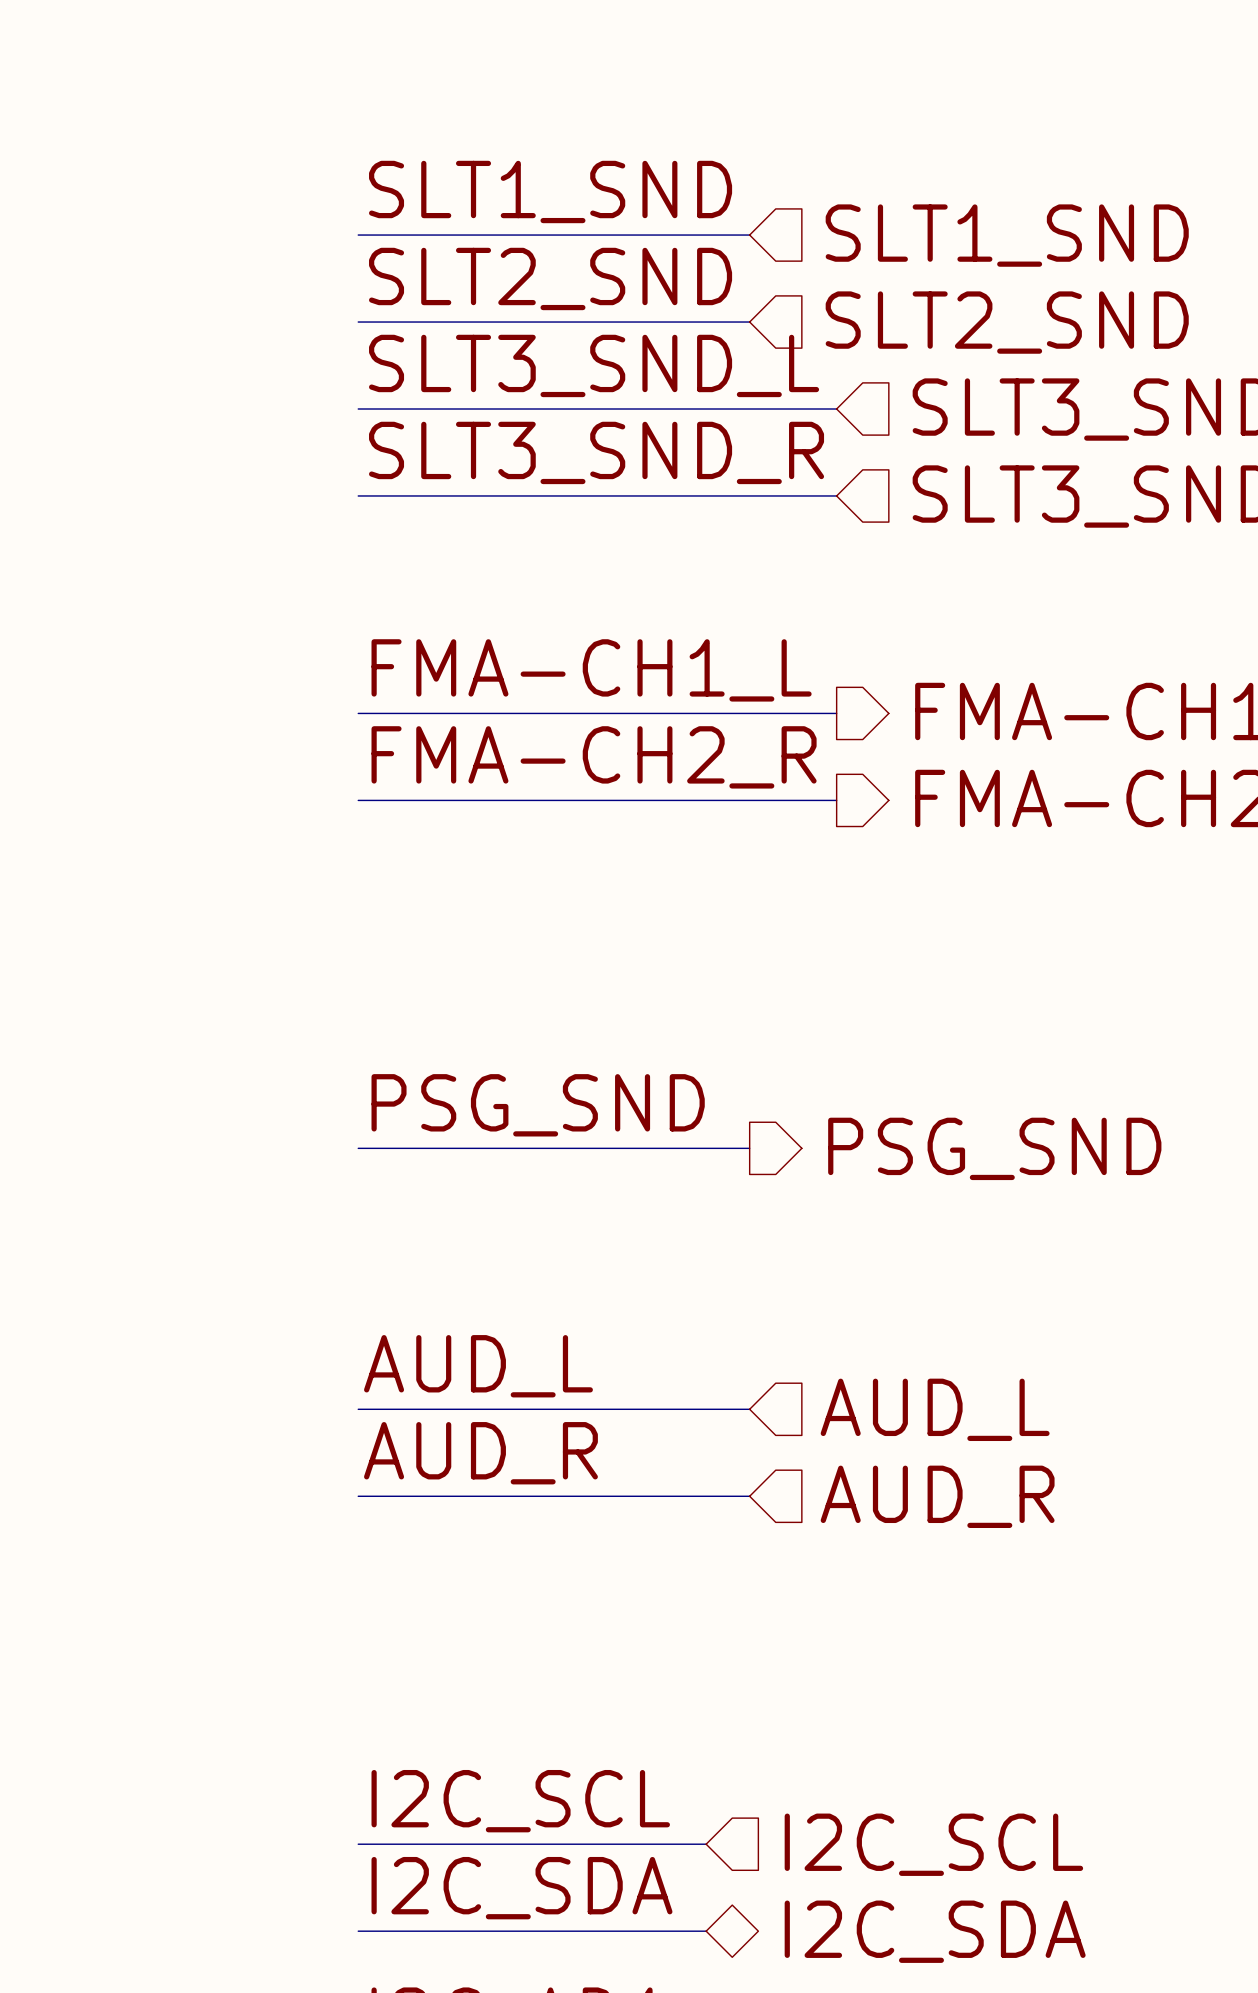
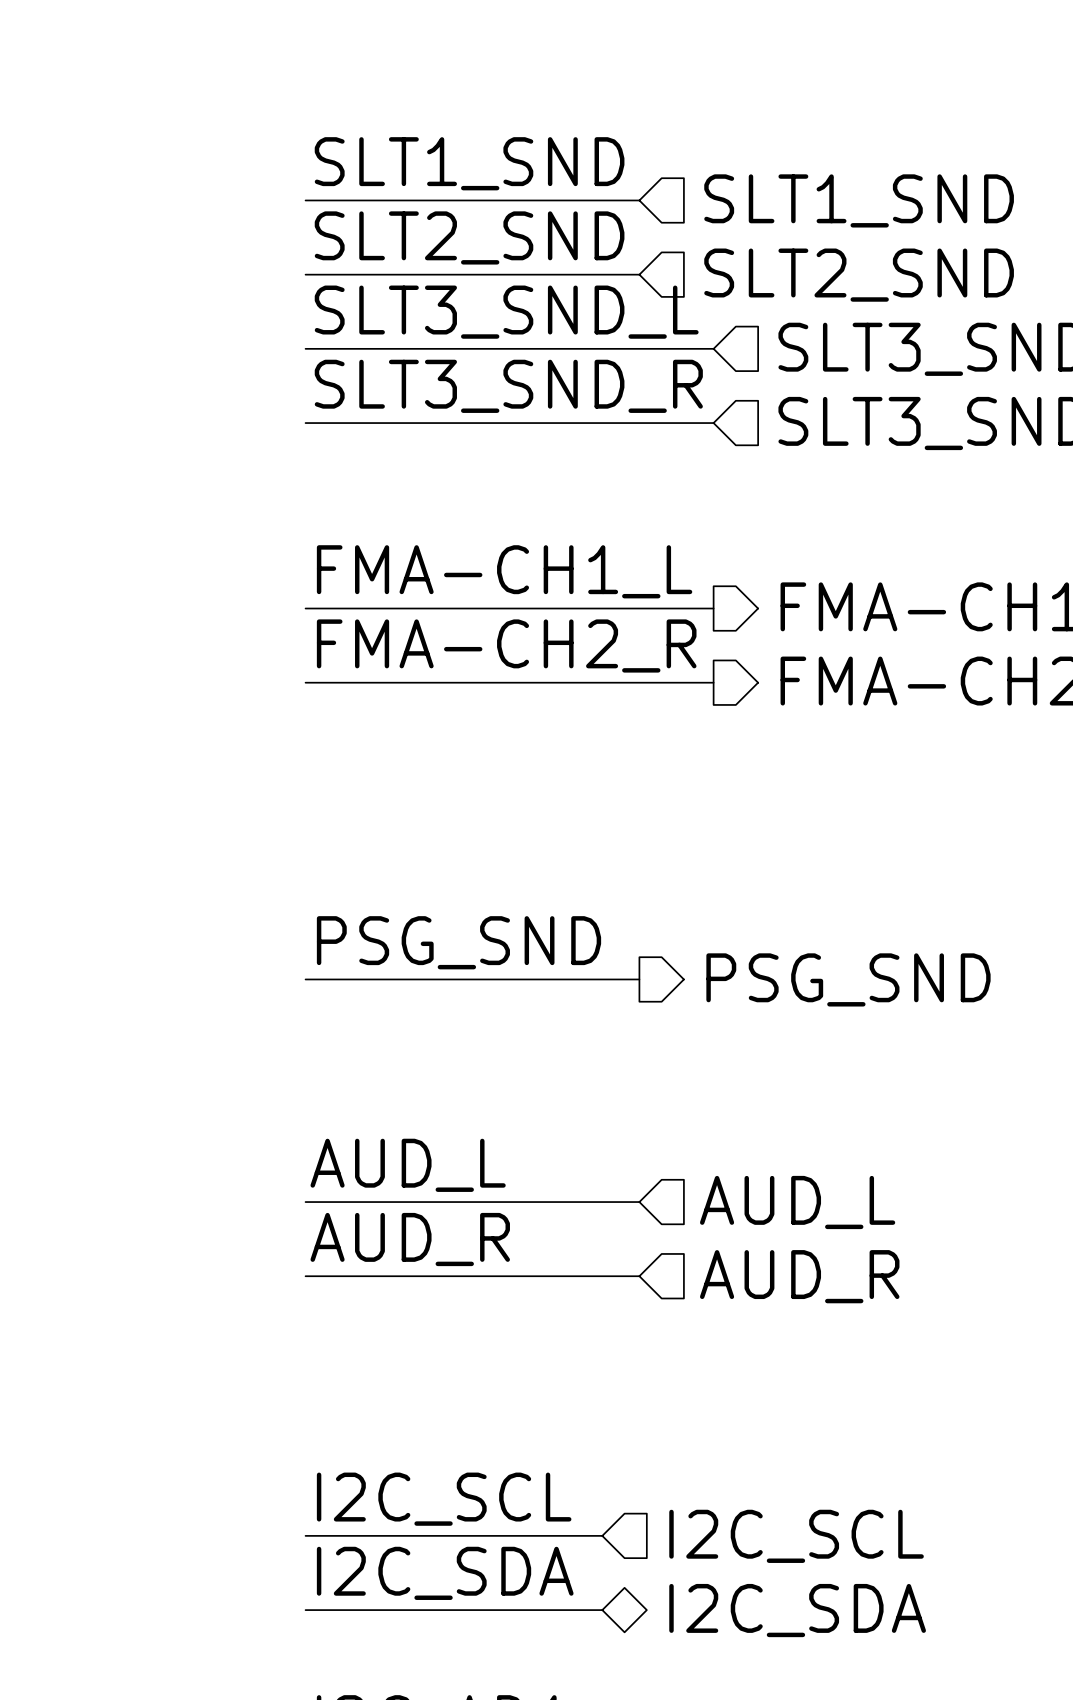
label position: I2C_SCL (520, 1801) -> I2C_SCL (444, 1499)
wire: (358, 1844) (706, 1844) -> (305, 1610) (602, 1610)
hierarchical label position: I2C_SCL (933, 1844) -> I2C_SCL (796, 1536)
label position: I2C_SDA (521, 1888) -> I2C_SDA (445, 1573)
wire: (358, 1931) (706, 1931) -> (305, 1535) (602, 1535)
hierarchical label position: I2C_SDA (935, 1931) -> I2C_SDA (797, 1610)

